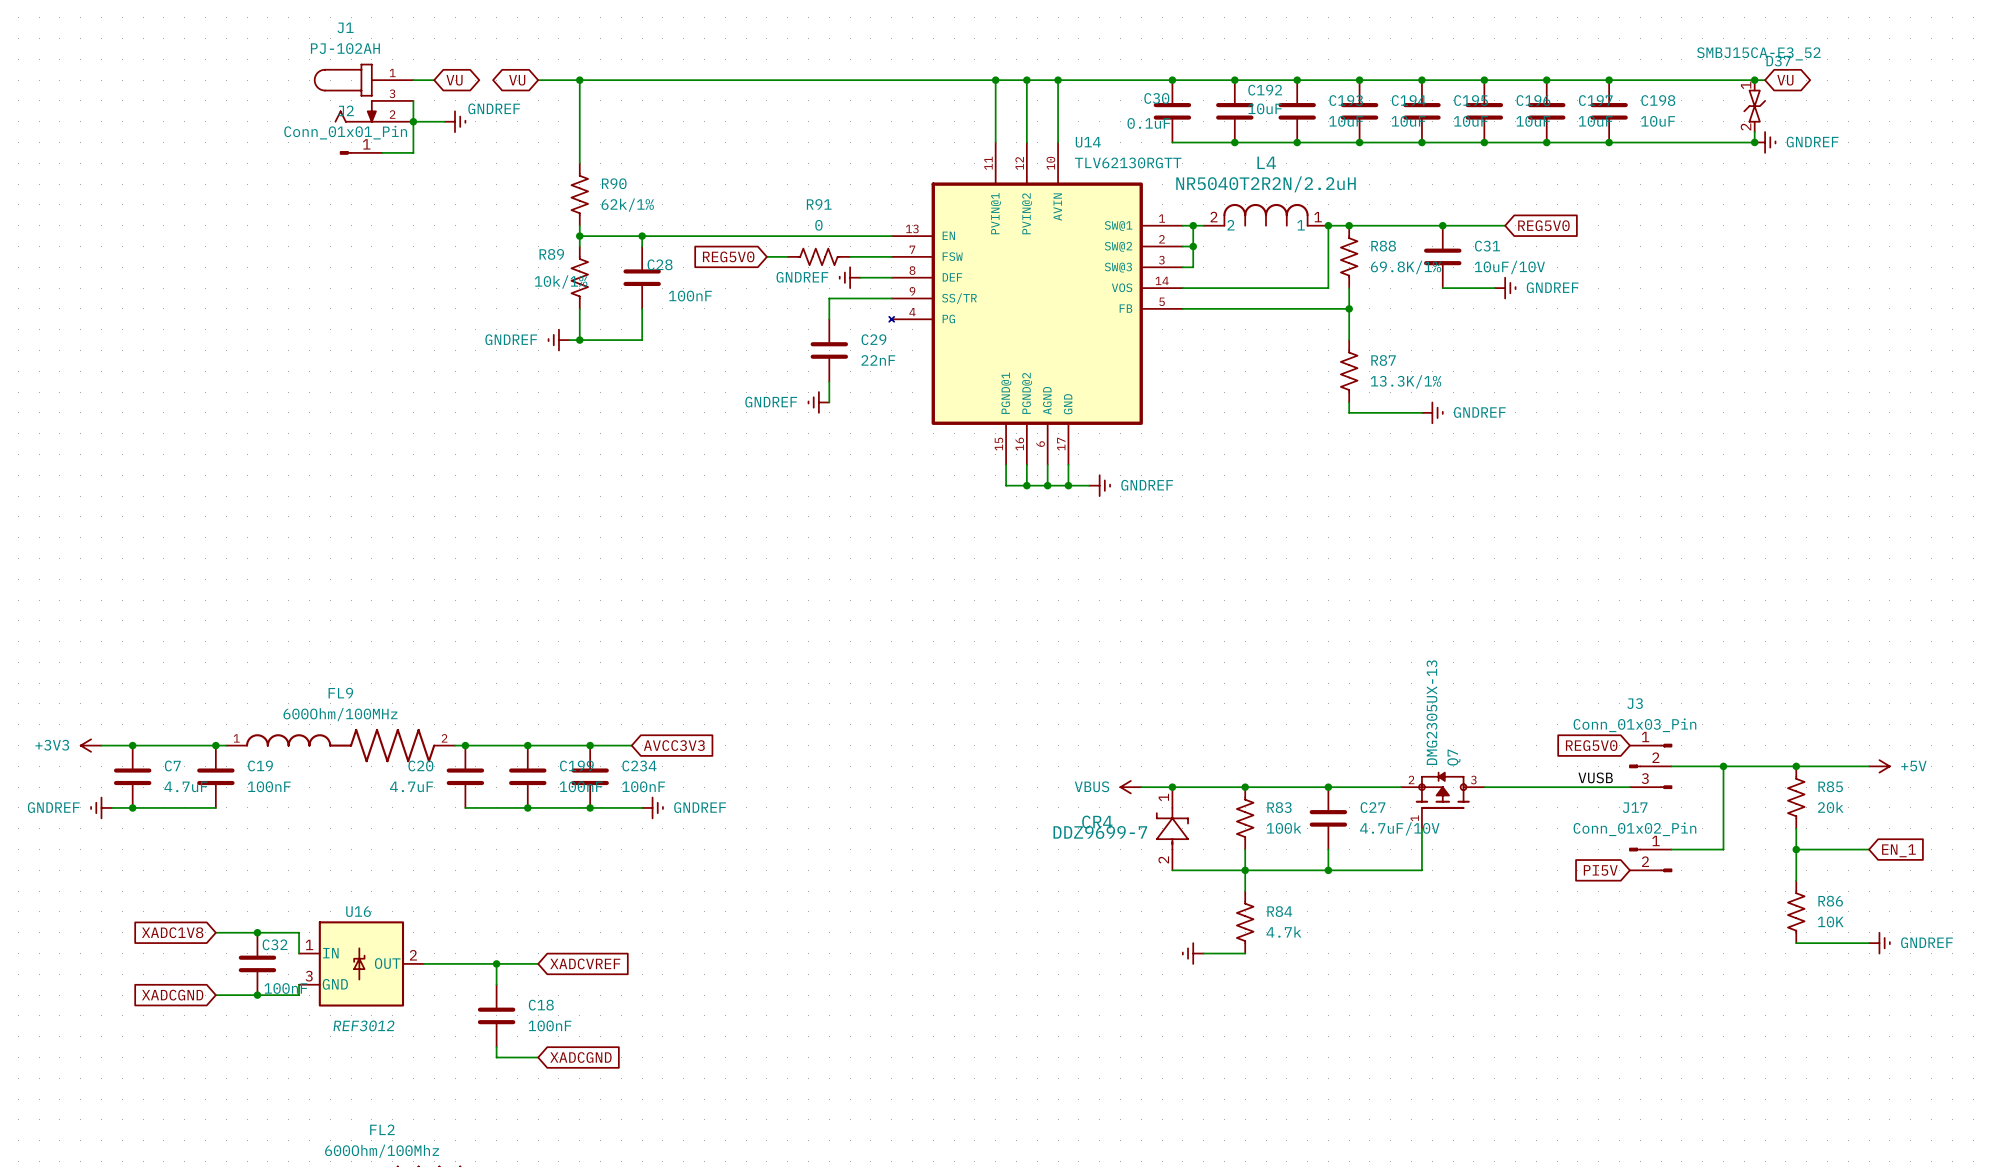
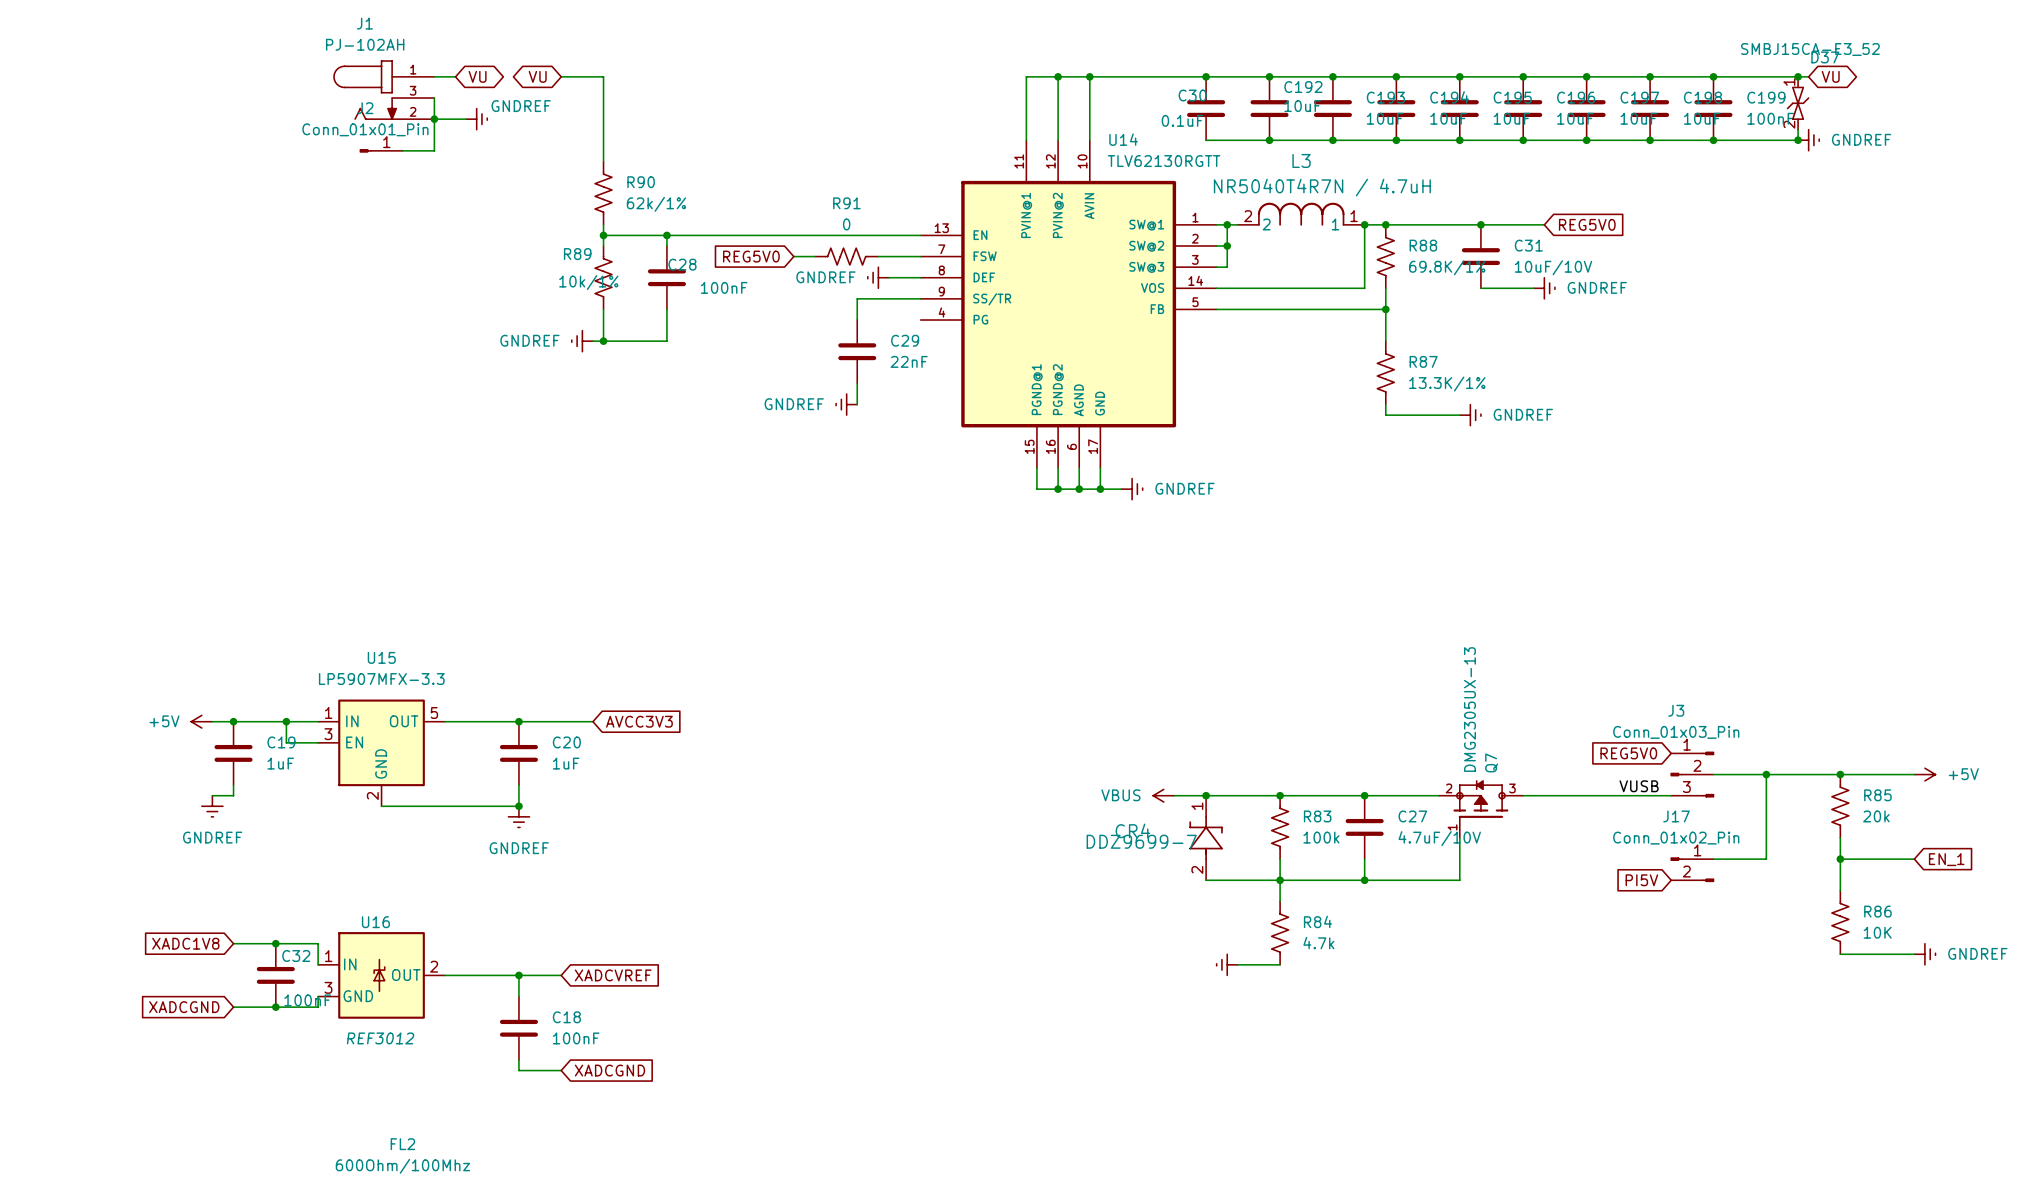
wire: (579, 80) (995, 80) -> none
junction: (579, 80) -> none
junction: (995, 80) -> none
junction: none -> (1713, 76)
U14 symbol: [889, 142, 1183, 465] -> [920, 140, 1217, 469]
junction: none -> (1713, 140)
L4 name: L4 (1266, 162) -> L3 (1301, 160)
L4 value: NR5040T2R2N/2.2uH (1266, 184) -> NR5040T4R7N / 4.7uH (1322, 187)
C28 value position: 100nF (690, 296) -> 100nF (724, 287)
power symbol: none -> +5V (201, 721)
junction: none -> (233, 721)
wire: none -> (286, 721) (286, 742) (318, 742)
junction: none -> (286, 721)
wire: none -> (444, 721) (592, 721)
junction: none -> (518, 721)
power symbol: +3V3 (91, 745) -> none
wire: (101, 745) (226, 745) -> none
junction: (132, 745) -> none
junction: (215, 745) -> none
FL9: 600Ohm/100MHz (340, 745) -> none
U15: none -> LP5907MFX-3.3 (381, 752)
wire: (455, 745) (631, 745) -> none
junction: (465, 745) -> none
junction: (527, 745) -> none
junction: (590, 745) -> none
global label position: AVCC3V3 (674, 745) -> AVCC3V3 (639, 721)
C20 name position: C20 (420, 765) -> C20 (566, 742)
C7: 4.7uF (132, 776) -> none
wire: none -> (233, 785) (233, 795) (212, 795)
C19 position: (215, 776) -> (233, 753)
C20 position: (465, 776) -> (518, 753)
wire: none -> (518, 785) (518, 806) (381, 806)
C199 position: (527, 776) -> (1713, 108)
C234: 100nF (590, 776) -> none
C19 value: 100nF (269, 786) -> 1uF (280, 763)
C20 value: 4.7uF (411, 786) -> 1uF (566, 763)
junction: none -> (518, 806)
power symbol text position: GNDREF (53, 807) -> GNDREF (212, 837)
power symbol rotation: 0° (101, 807) -> 90° counterclockwise (212, 806)
power symbol position: GNDREF (101, 807) -> GNDREF (212, 806)
wire: (111, 807) (215, 807) -> (212, 721) (318, 721)
junction: (132, 807) -> none
wire: (465, 807) (642, 807) -> none
junction: (527, 807) -> none
junction: (590, 807) -> none
power symbol rotation: 0° (652, 807) -> 90° clockwise (518, 816)
power symbol position: GNDREF (652, 807) -> GNDREF (518, 816)
power symbol text position: GNDREF (700, 807) -> GNDREF (519, 848)

